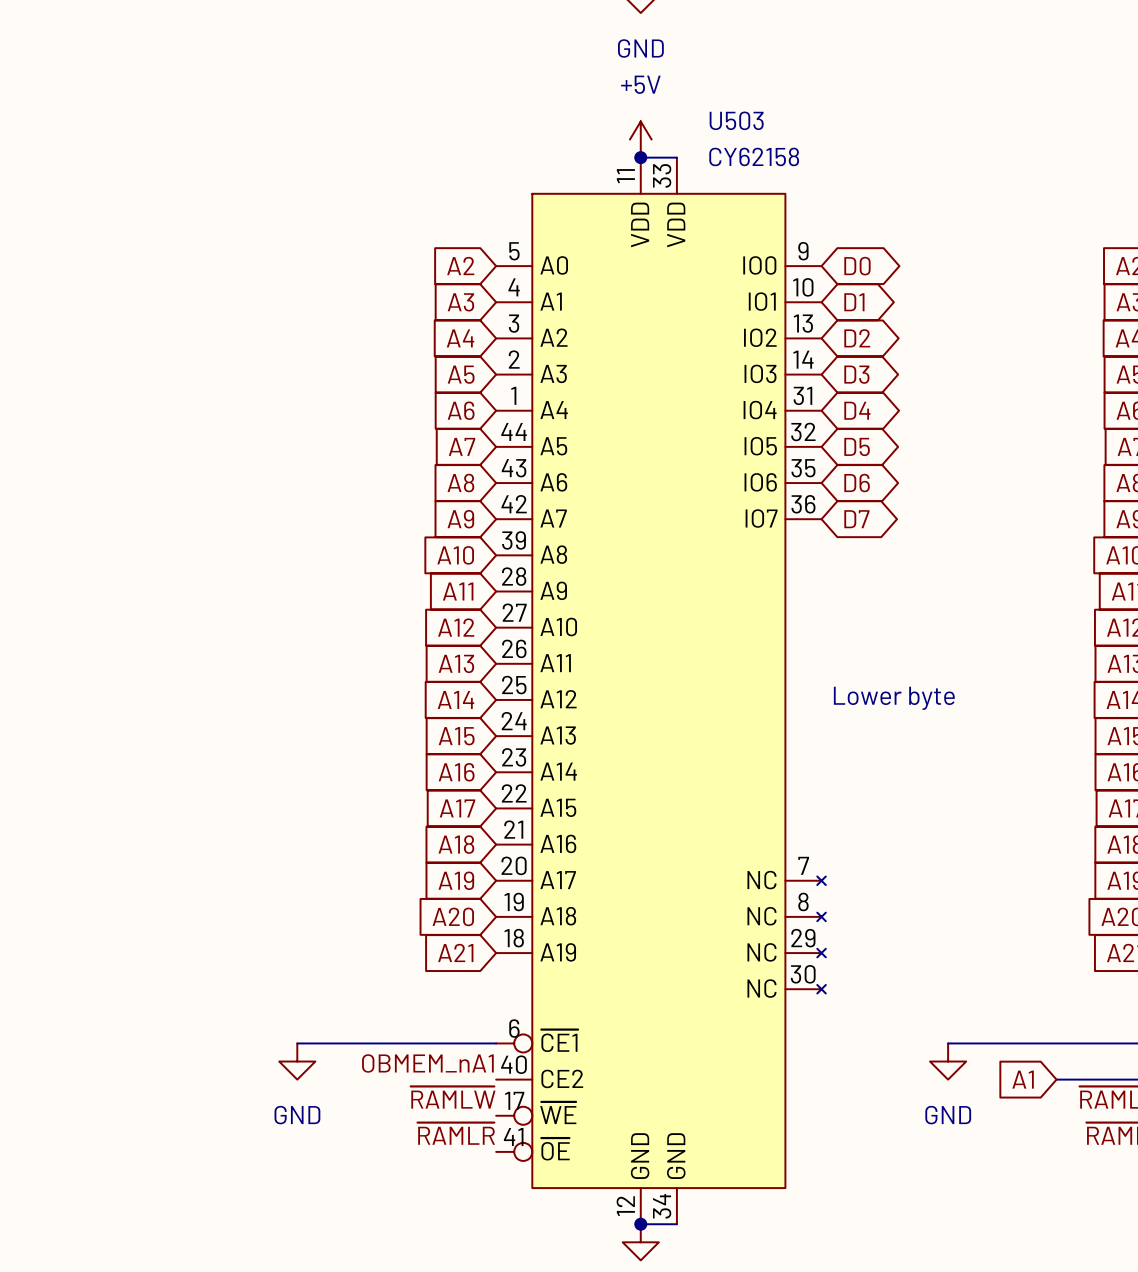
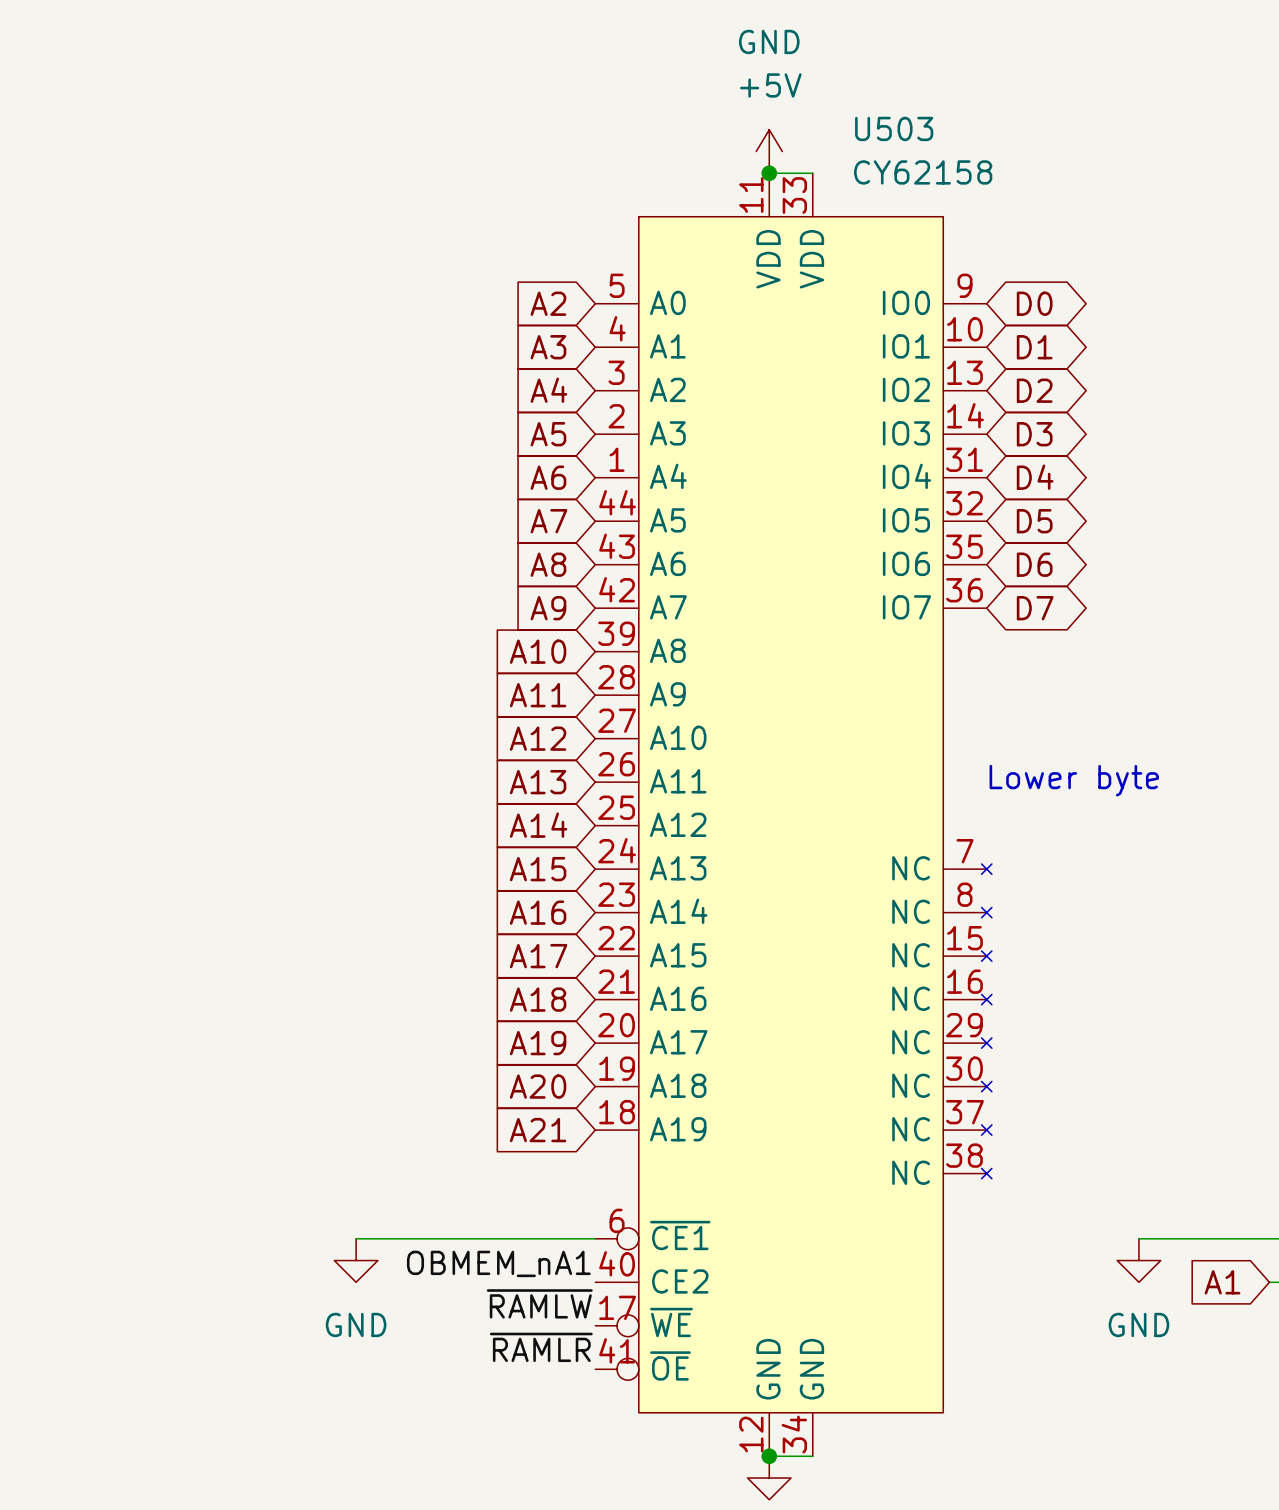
U503 symbol: [496, 157, 826, 1225] -> [595, 173, 992, 1457]
text position: Lower byte (894, 698) -> Lower byte (1074, 780)

